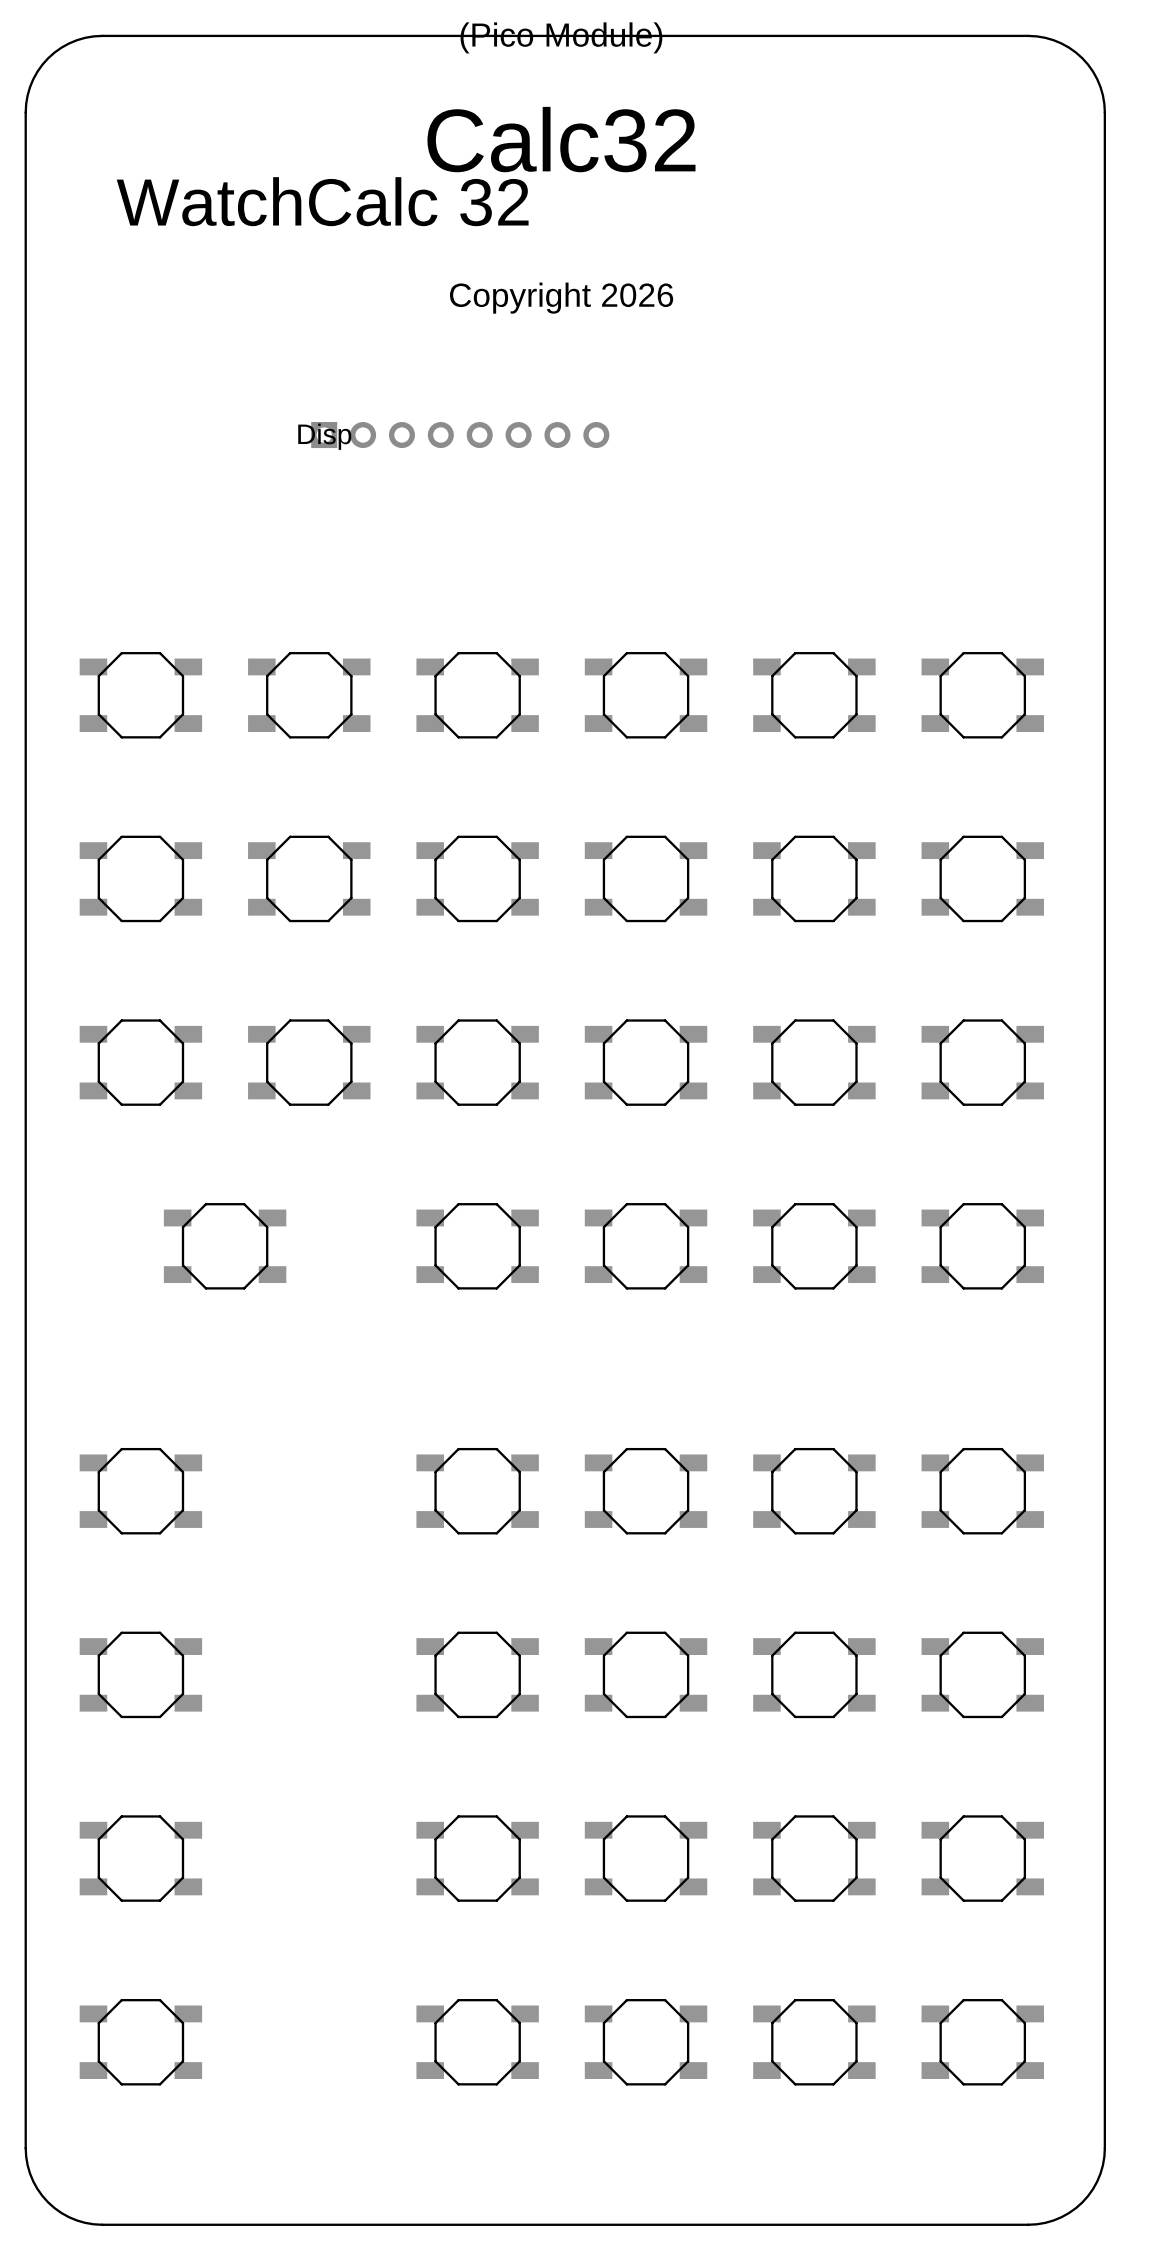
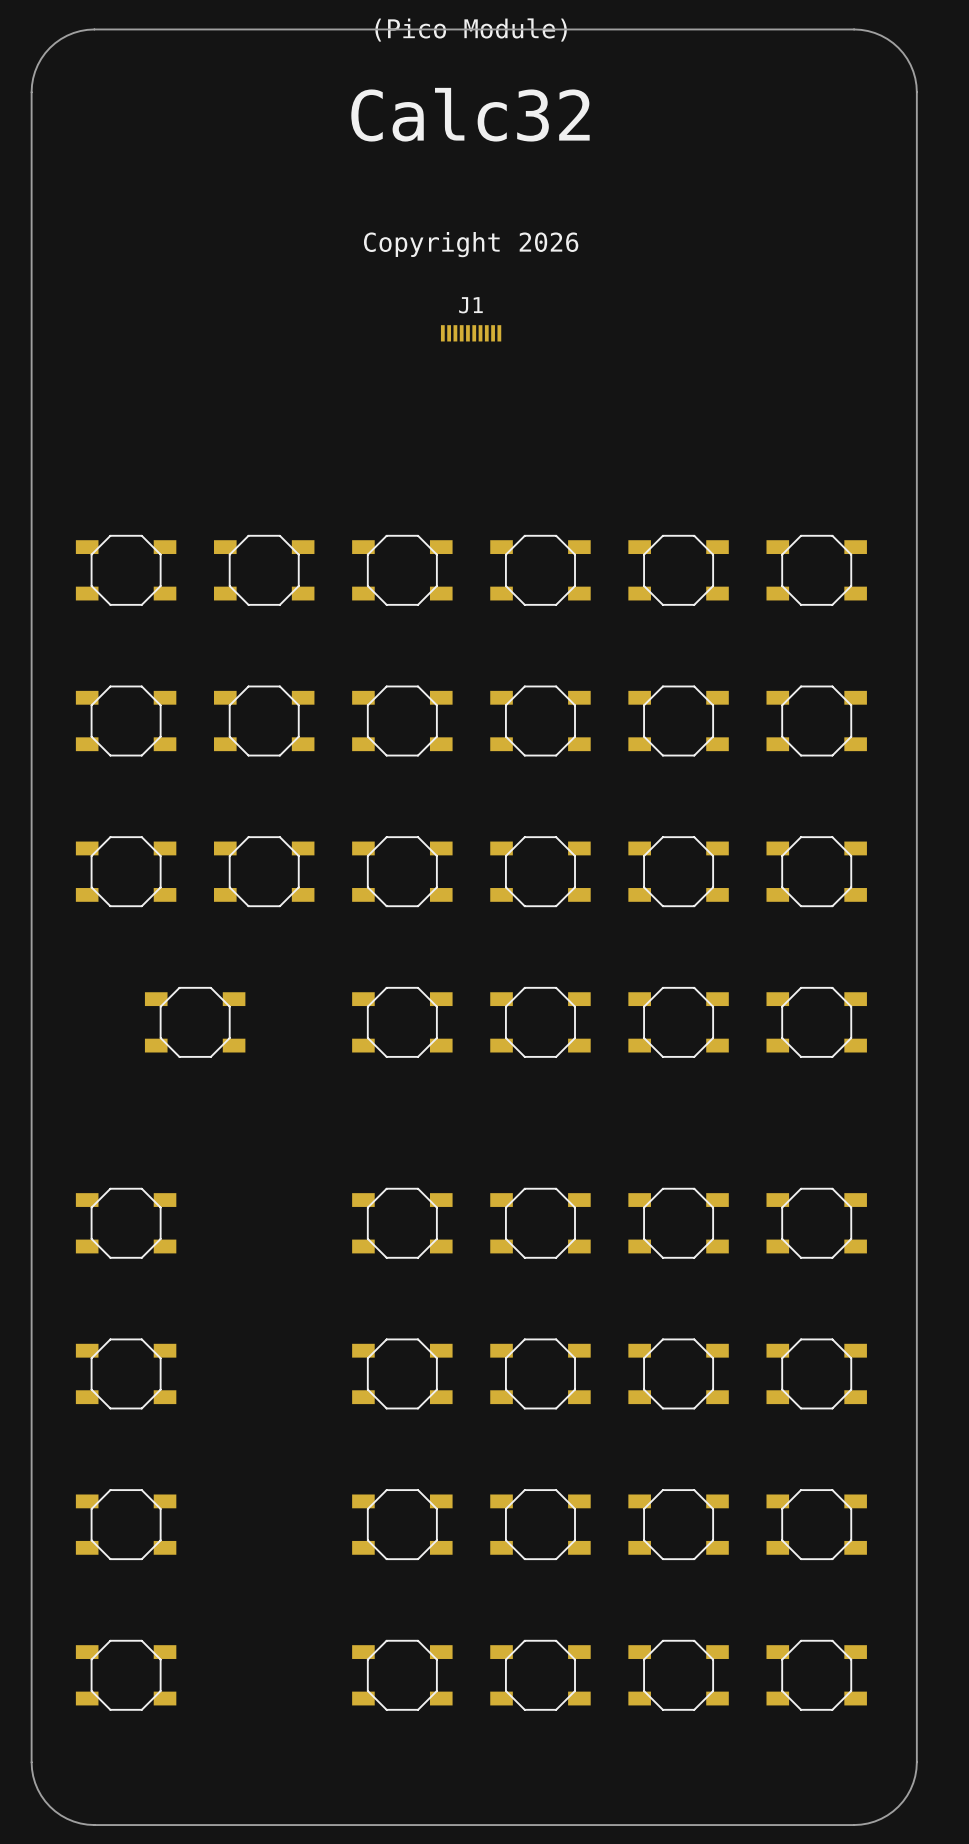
text: WatchCalc 32 (322, 201) -> none
J1: none -> (471, 333)
Disp: (460, 435) -> none

